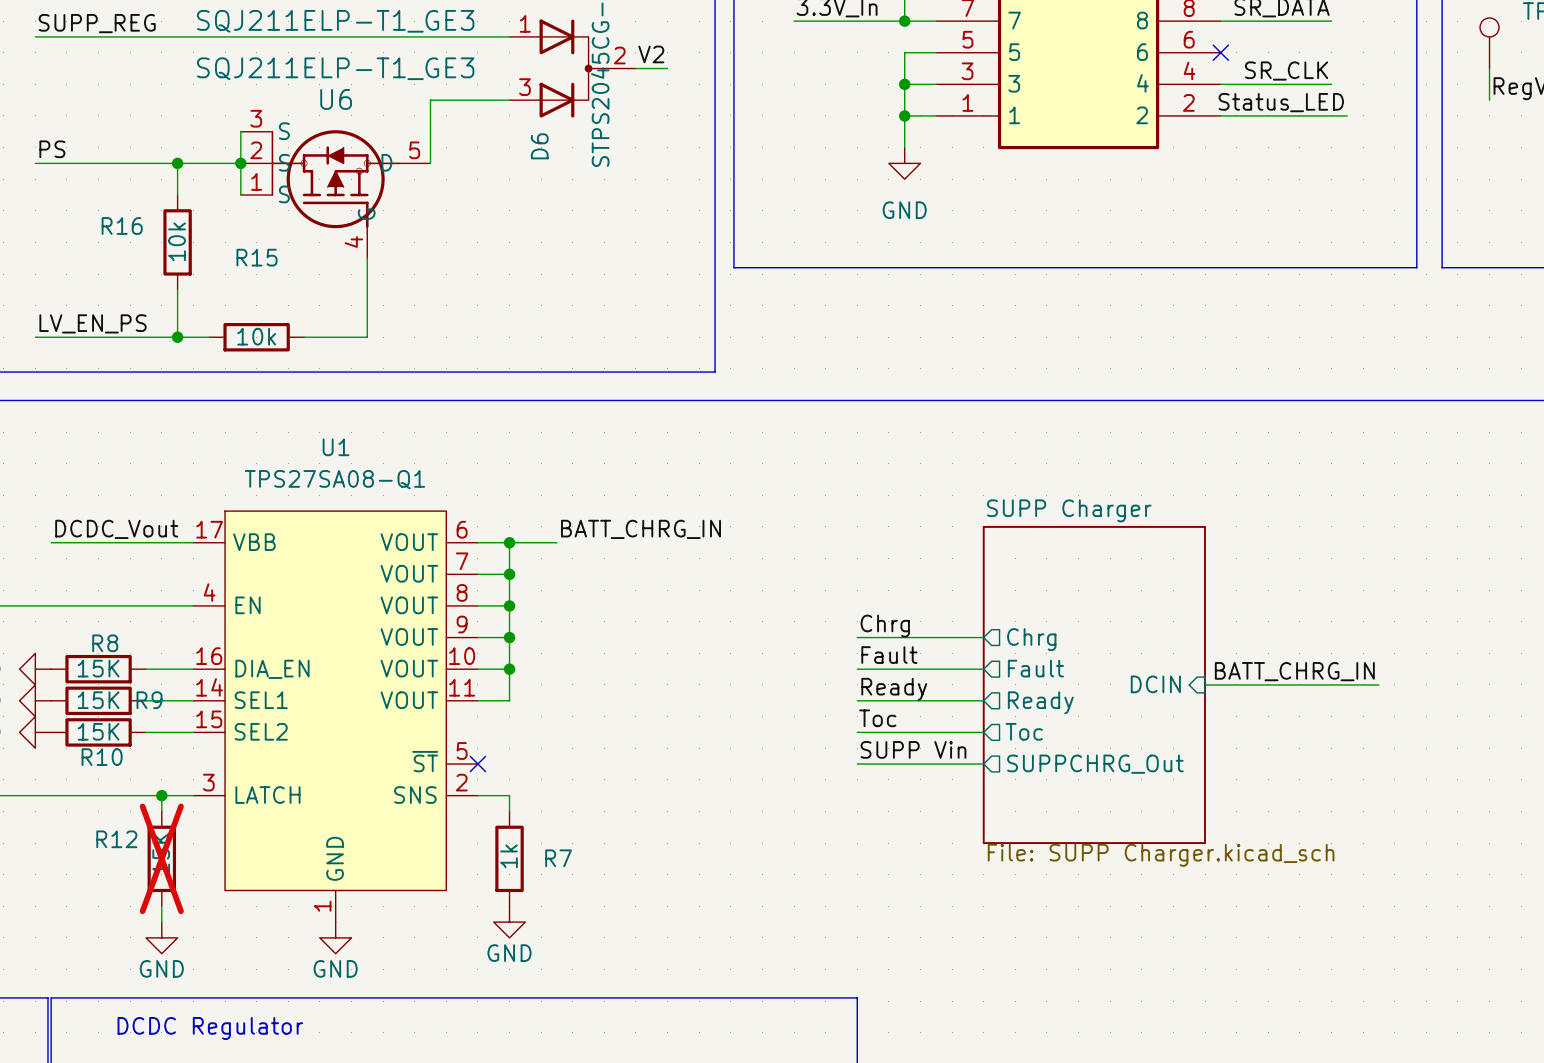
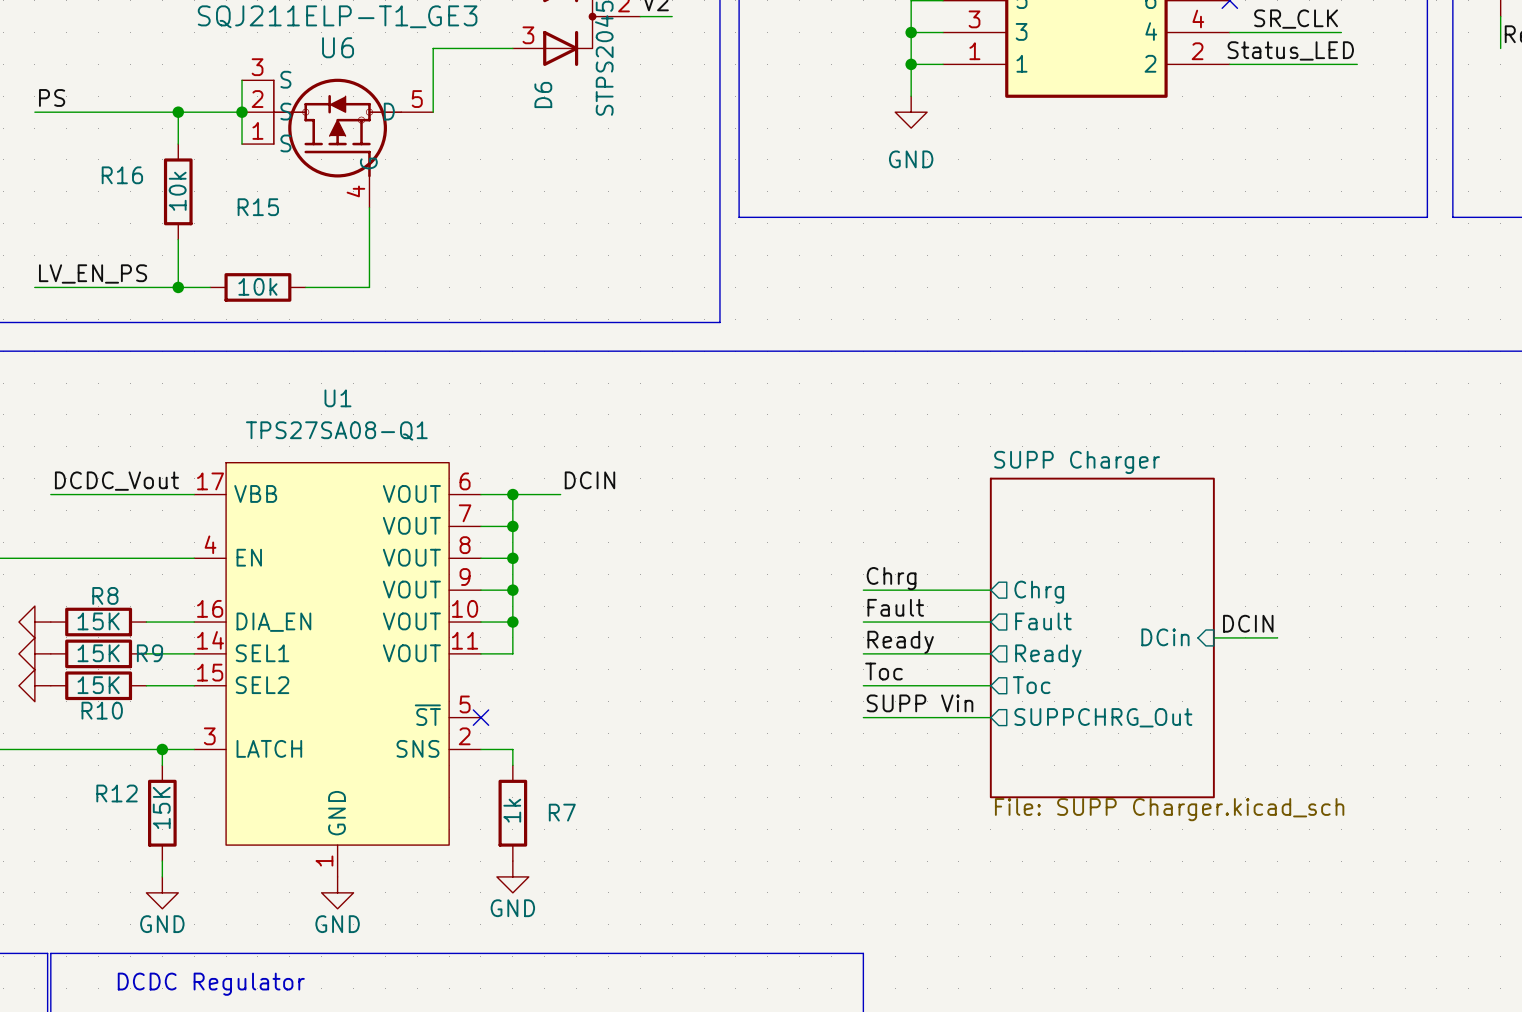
label: BATT_CHRG_IN (640, 529) -> DCIN (589, 480)
label: none -> DCIN (1248, 623)
label: BATT_CHRG_IN (1294, 671) -> none
sheet pin: DCIN (1155, 684) -> DCin (1165, 637)
wire: (1268, 684) (1378, 684) -> none
R12 do-not-place cross: (161, 858) -> none

